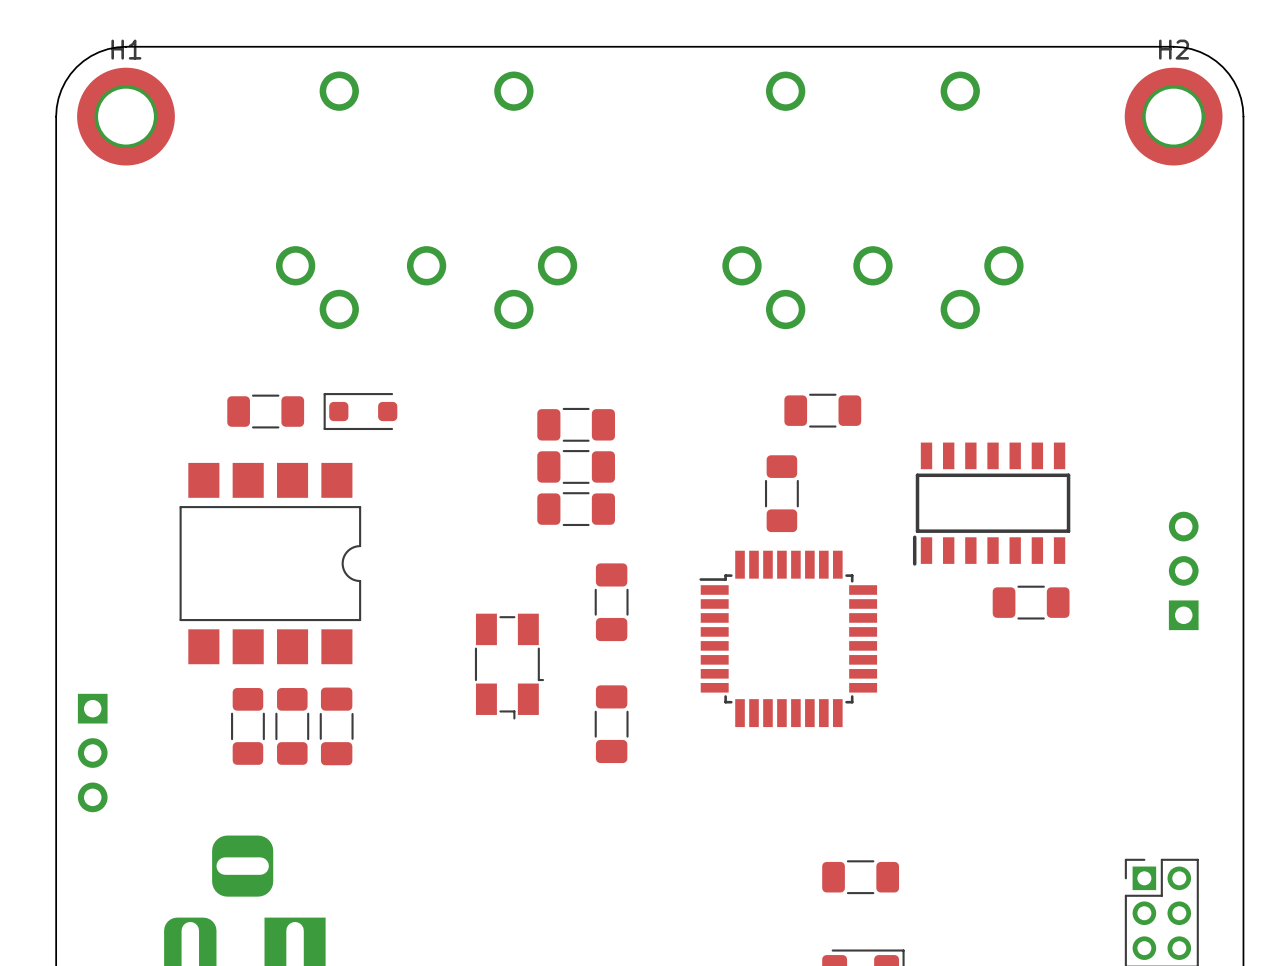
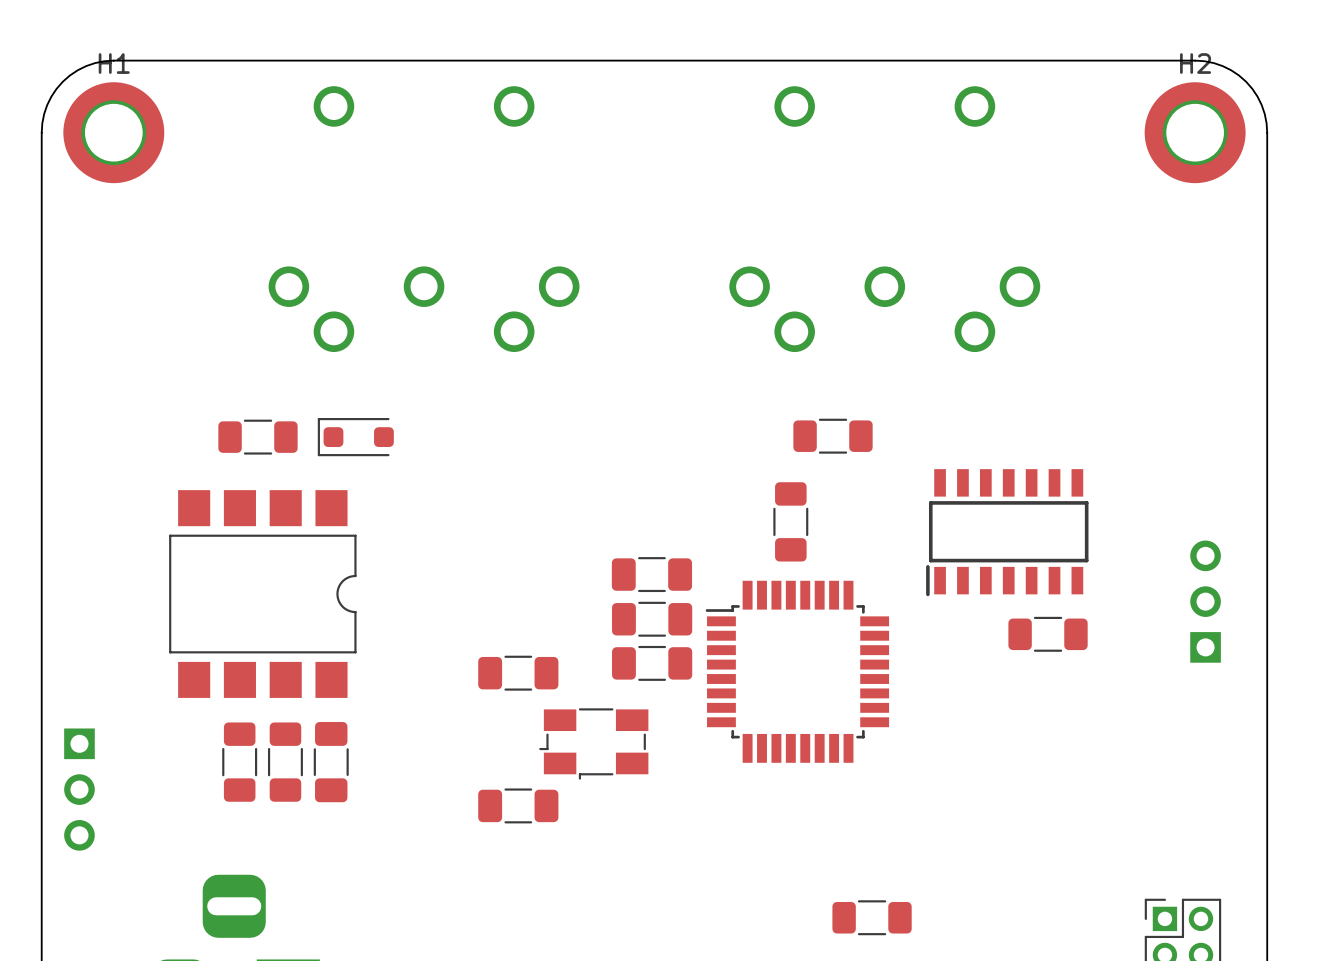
part: (576, 424) -> none
part: (576, 466) -> none
part: (576, 509) -> none
part: none -> (651, 574)
part: none -> (652, 619)
part: (611, 602) -> none
part: none -> (652, 663)
part: none -> (518, 673)
part rotation: 0° (509, 666) -> 90° clockwise (593, 744)
part position: (509, 666) -> (593, 744)
part: (611, 724) -> none
part: none -> (518, 805)

